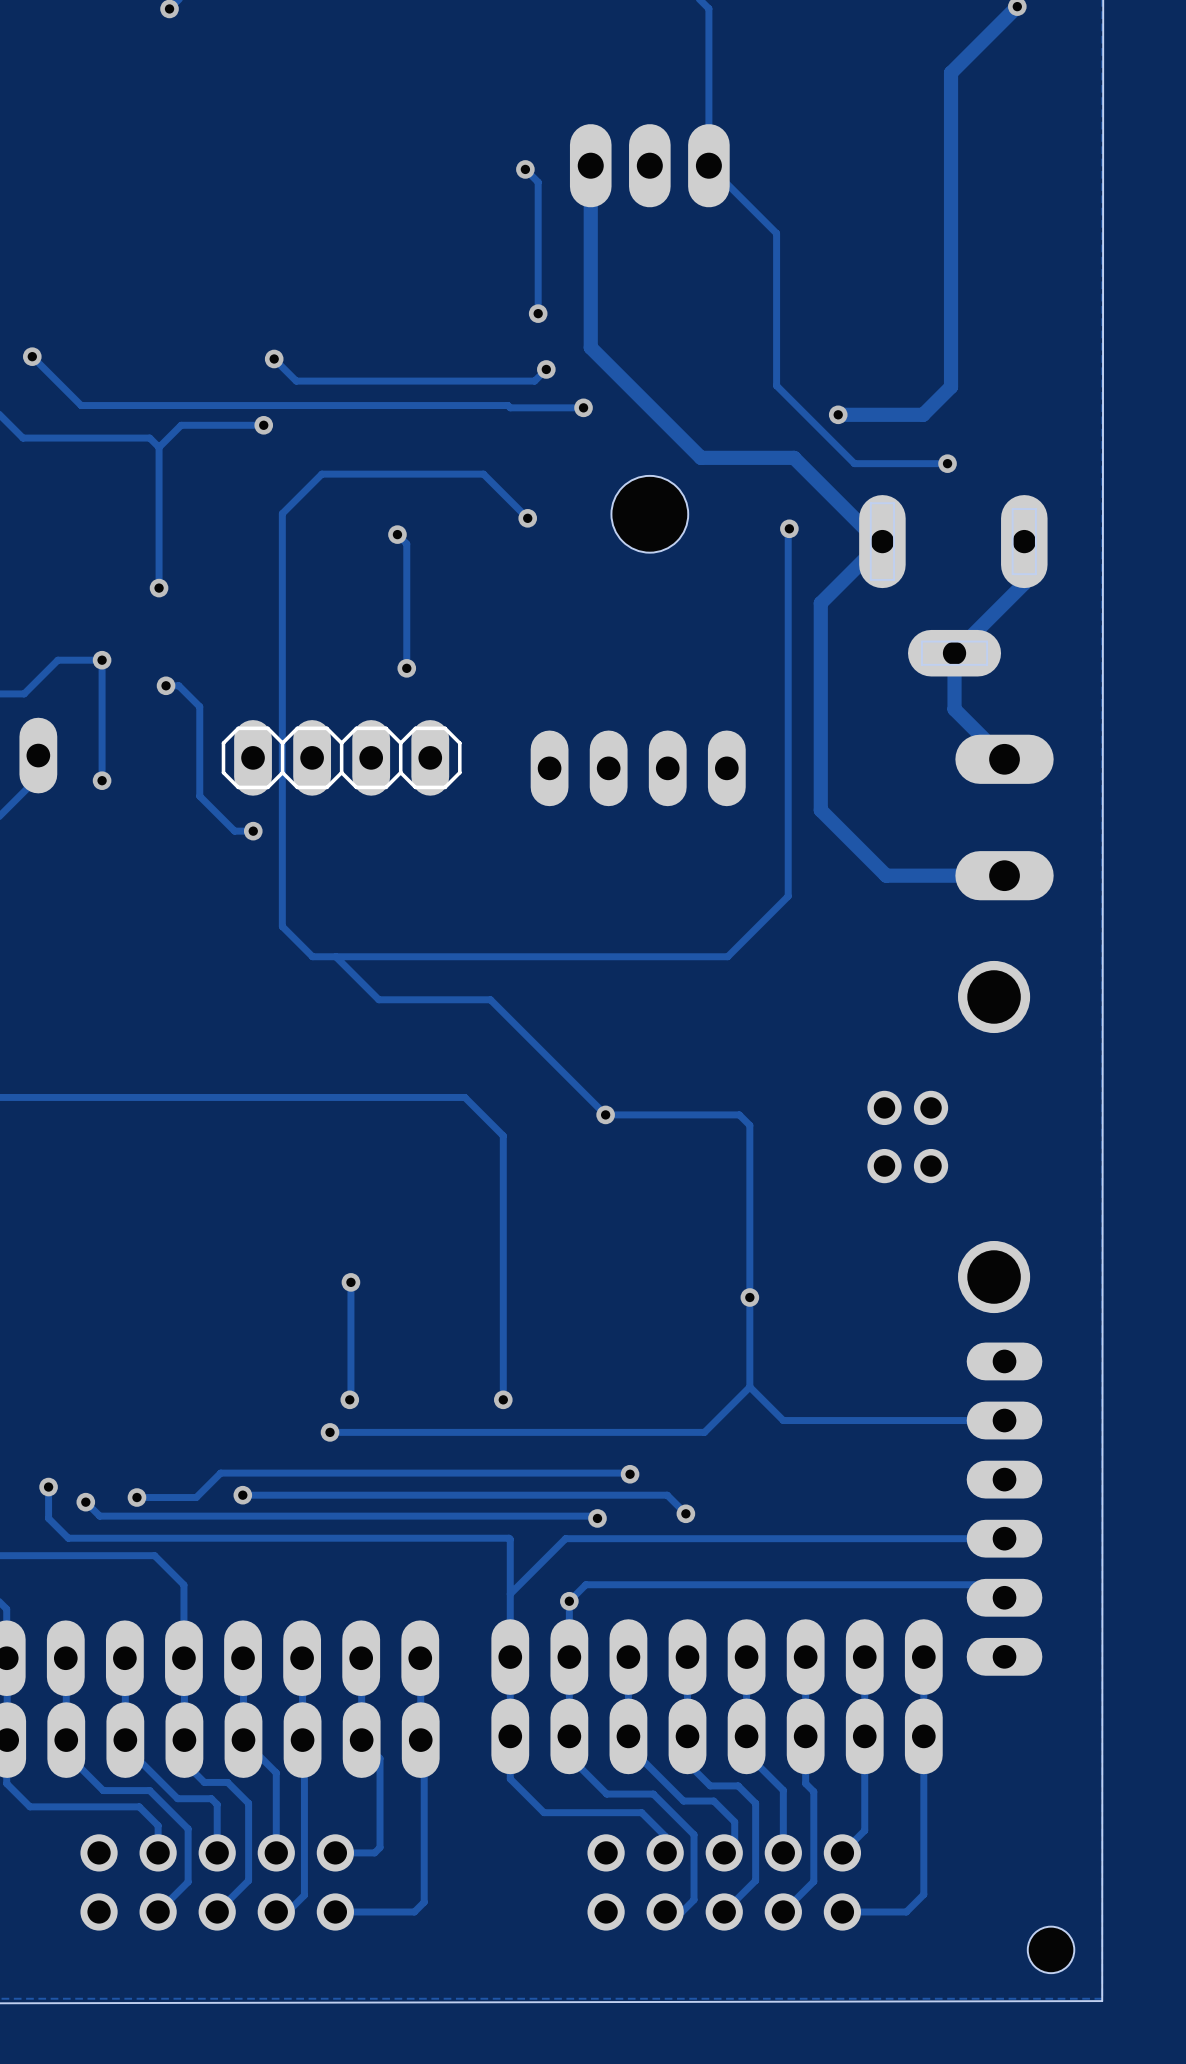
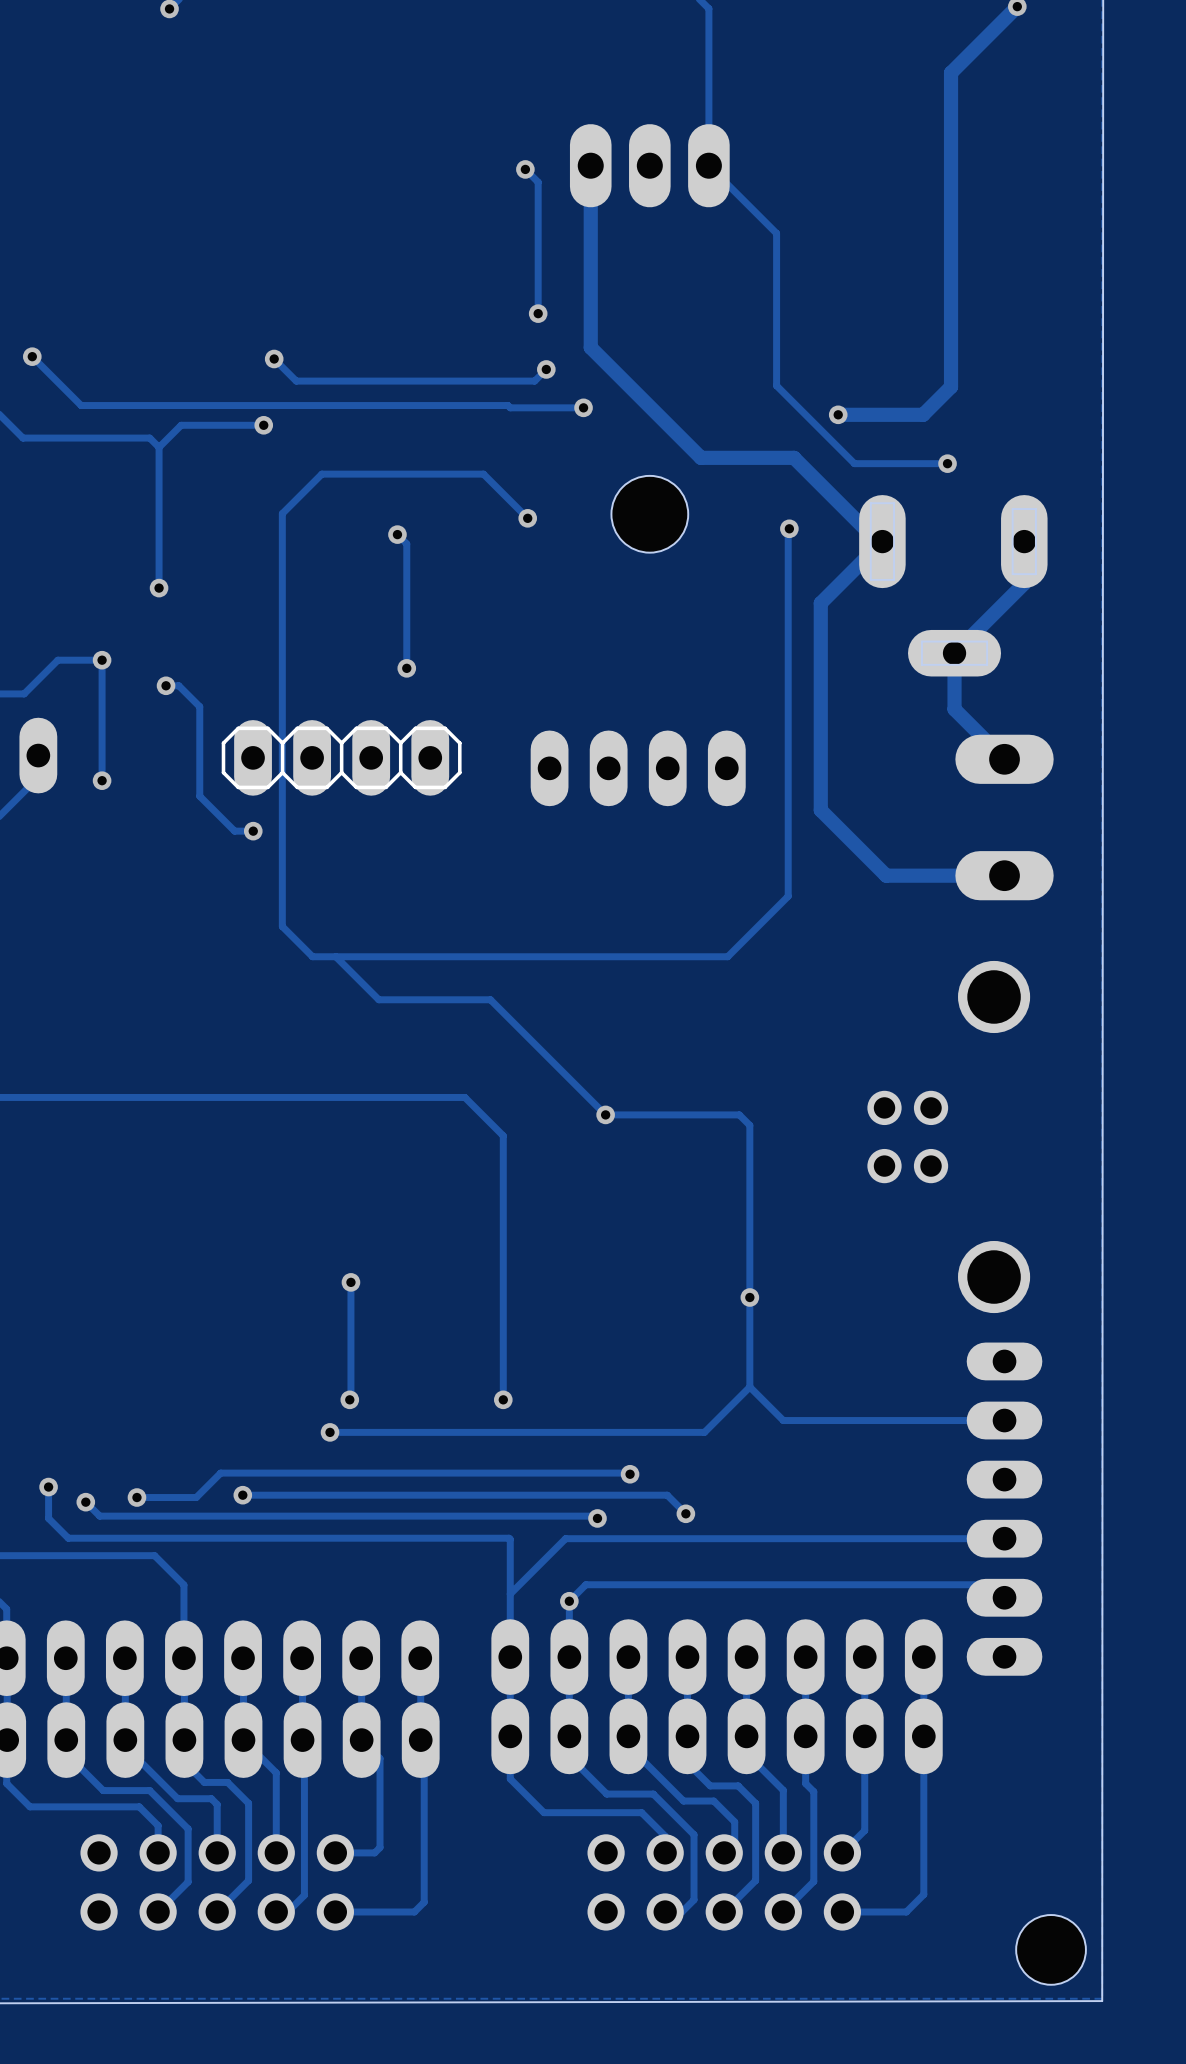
hole size: [1027, 1926, 1075, 1974] -> [1016, 1915, 1086, 1985]

